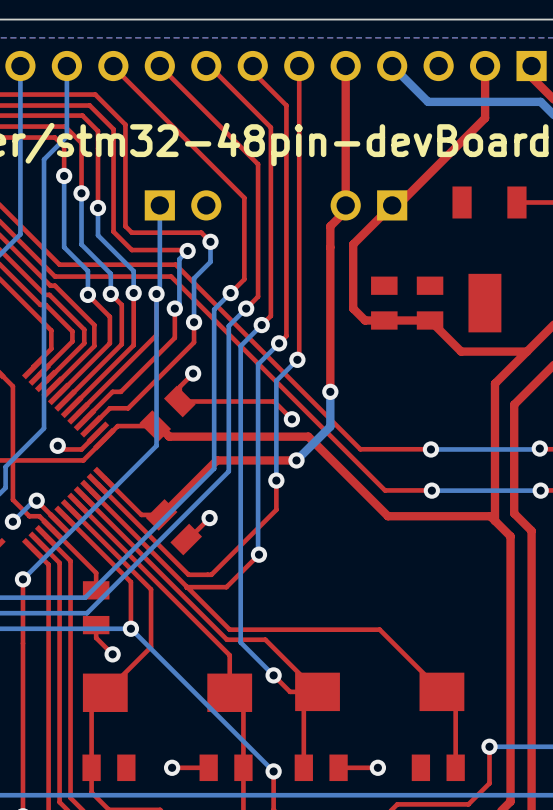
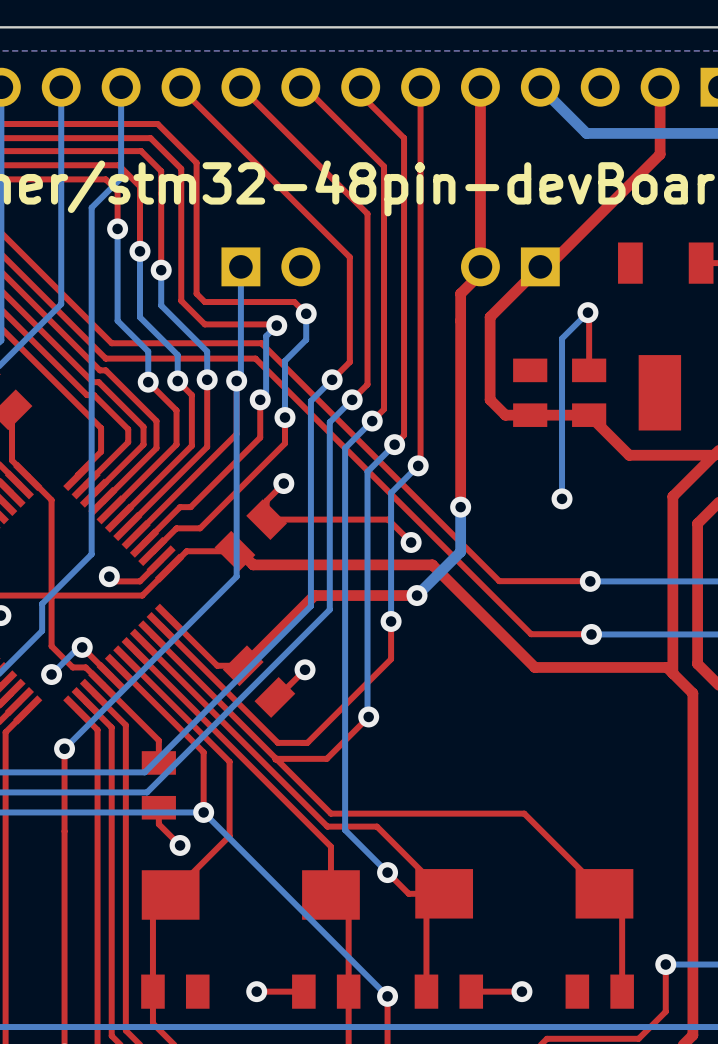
top track: none -> (587, 312) (589, 370)
bottom track: none -> (587, 312) (562, 338) (562, 498)
via: none -> (587, 312)
via: none -> (562, 498)

